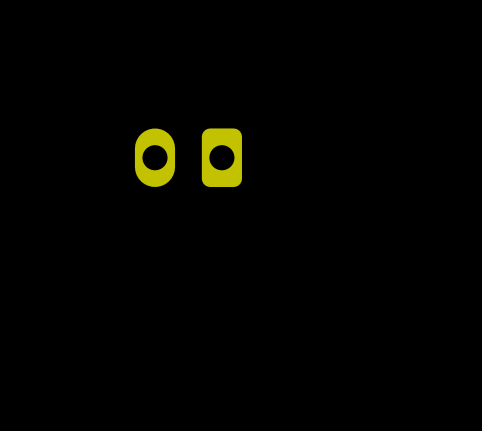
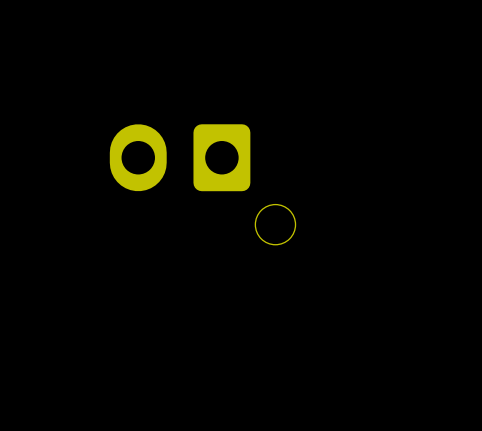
part footprint: [134, 128, 242, 188] -> [109, 124, 296, 245]

